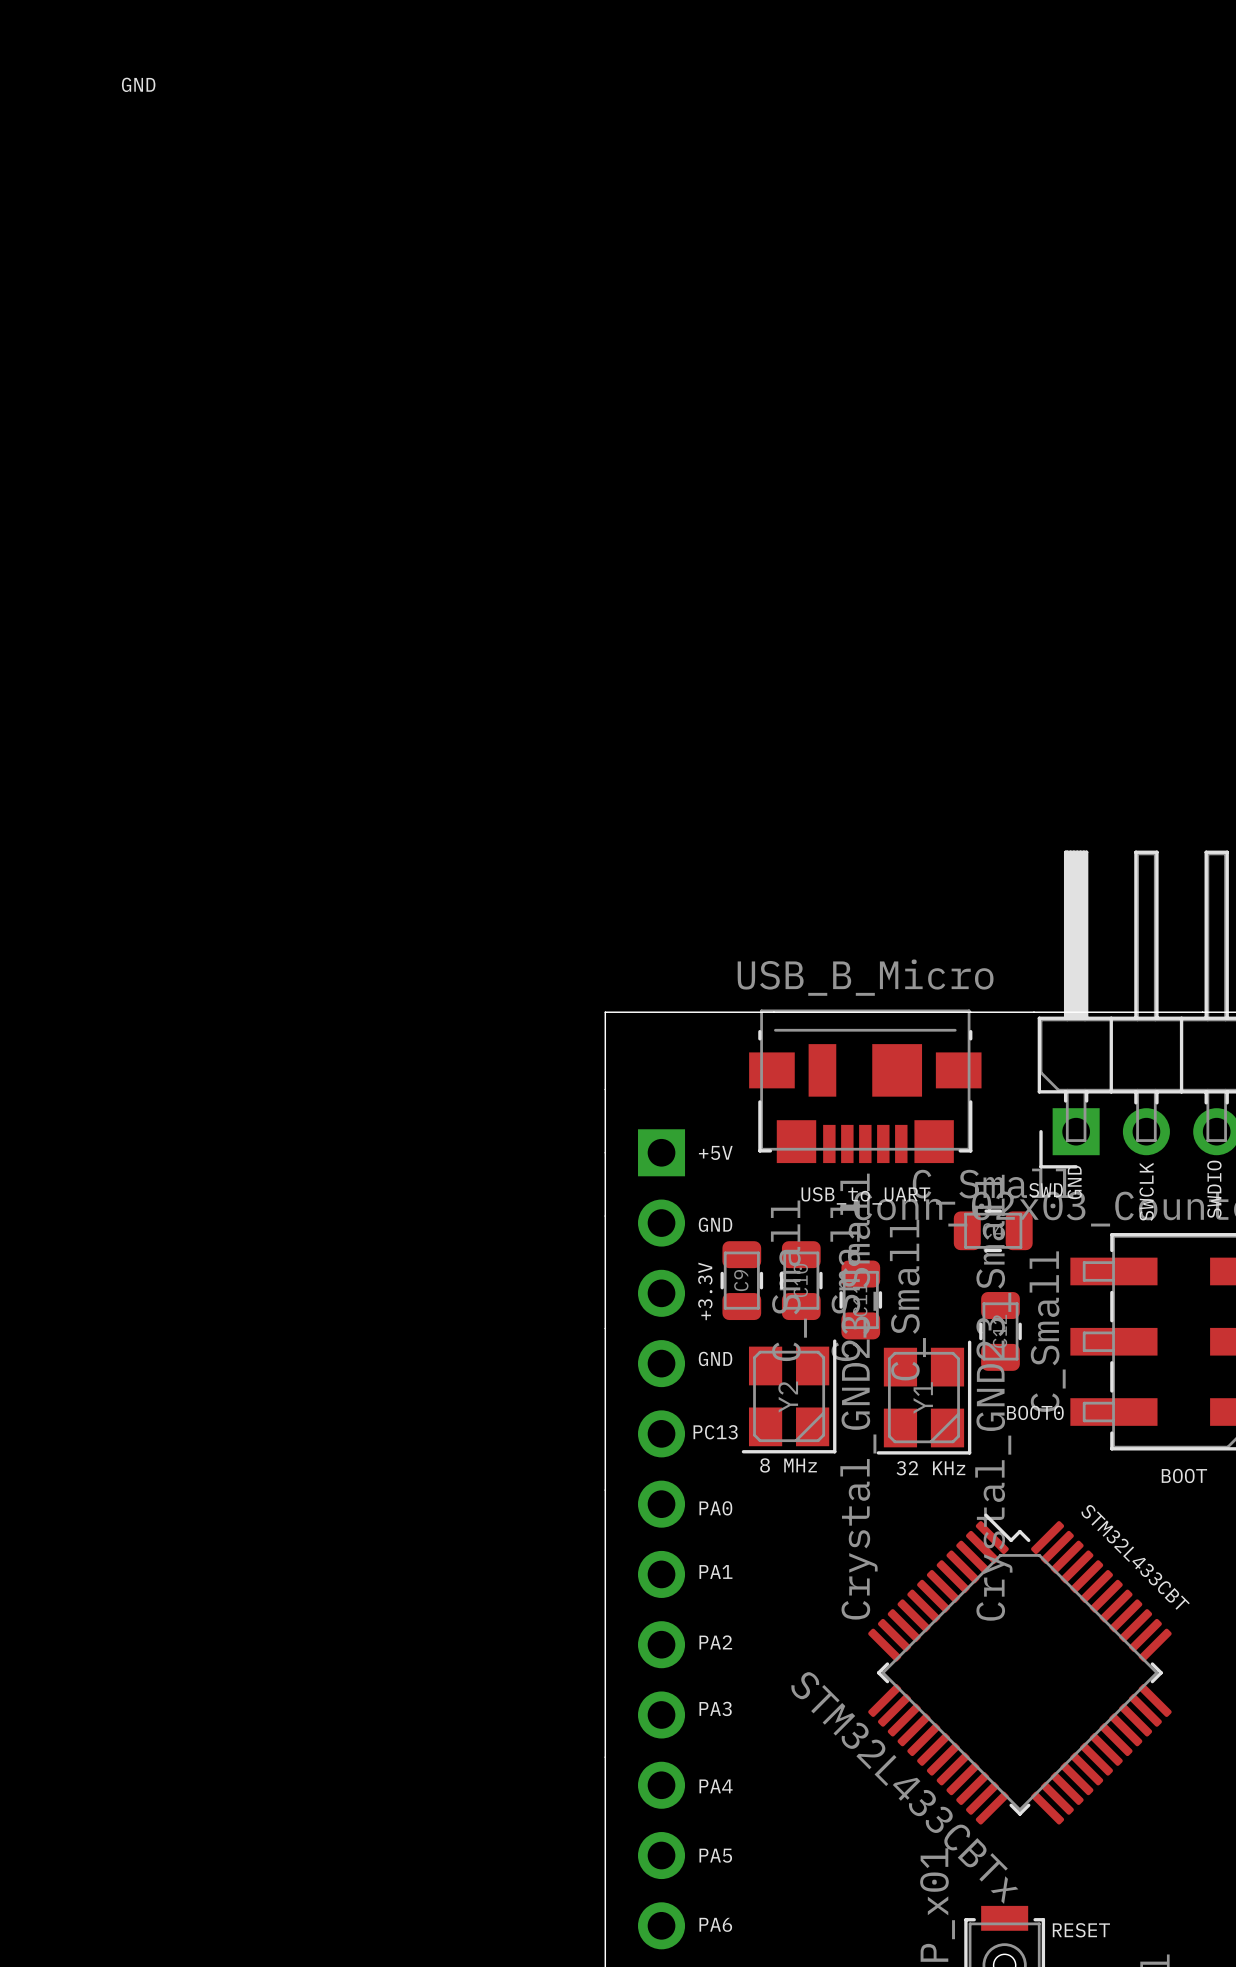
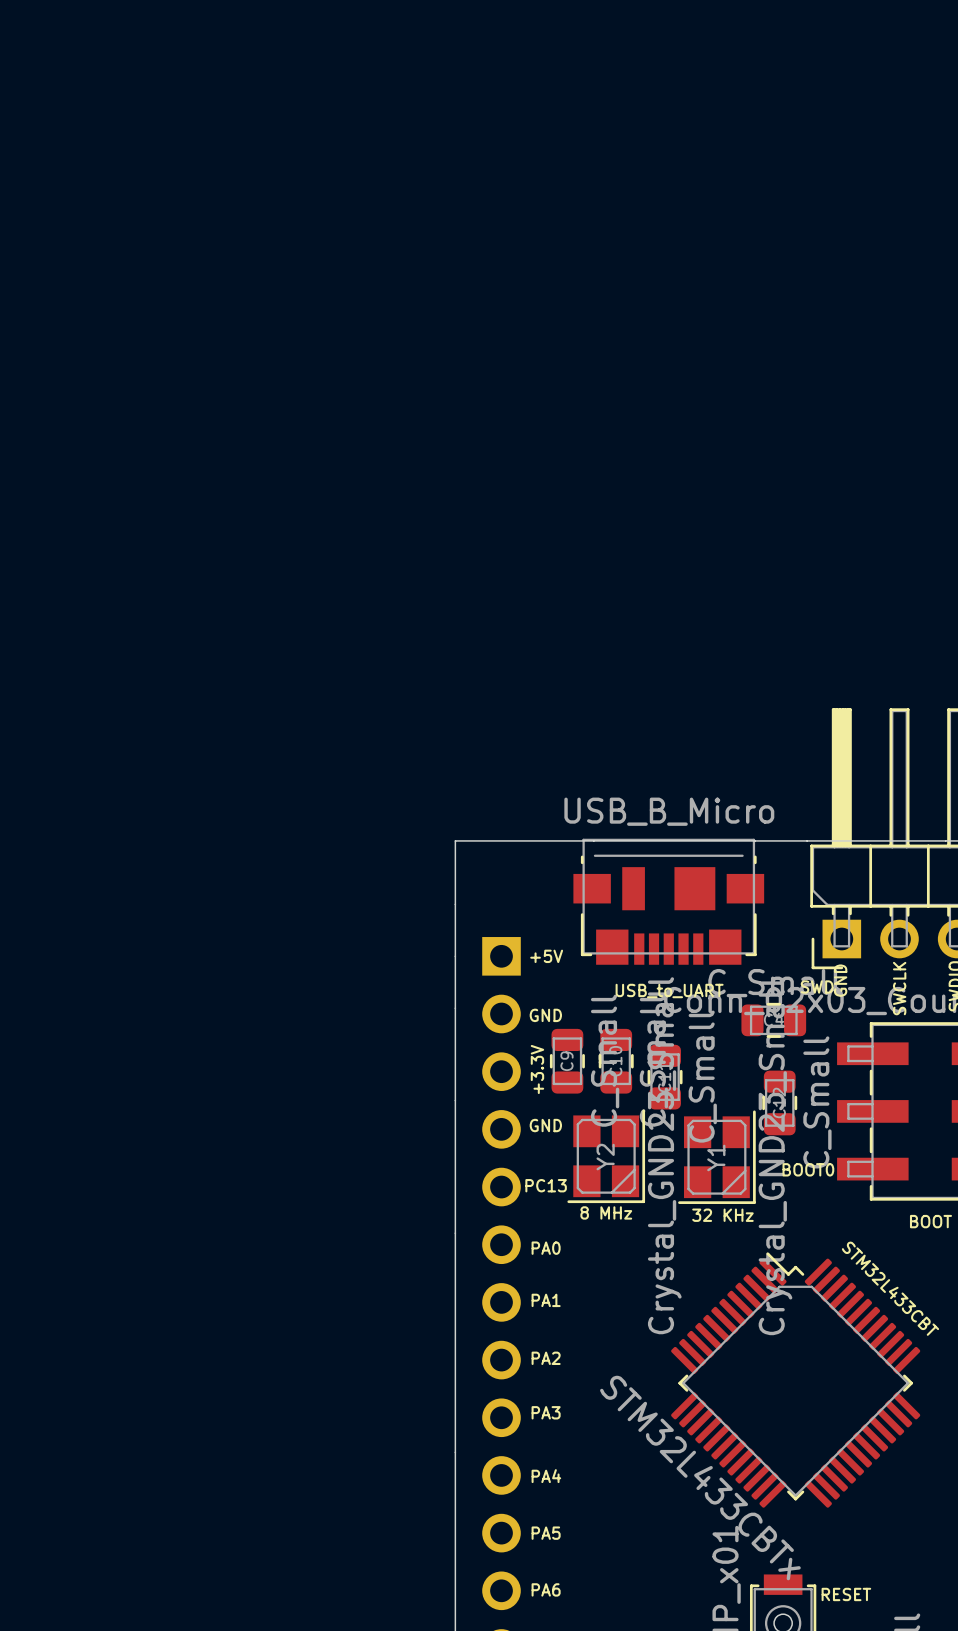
text: GND (138, 84) -> none

